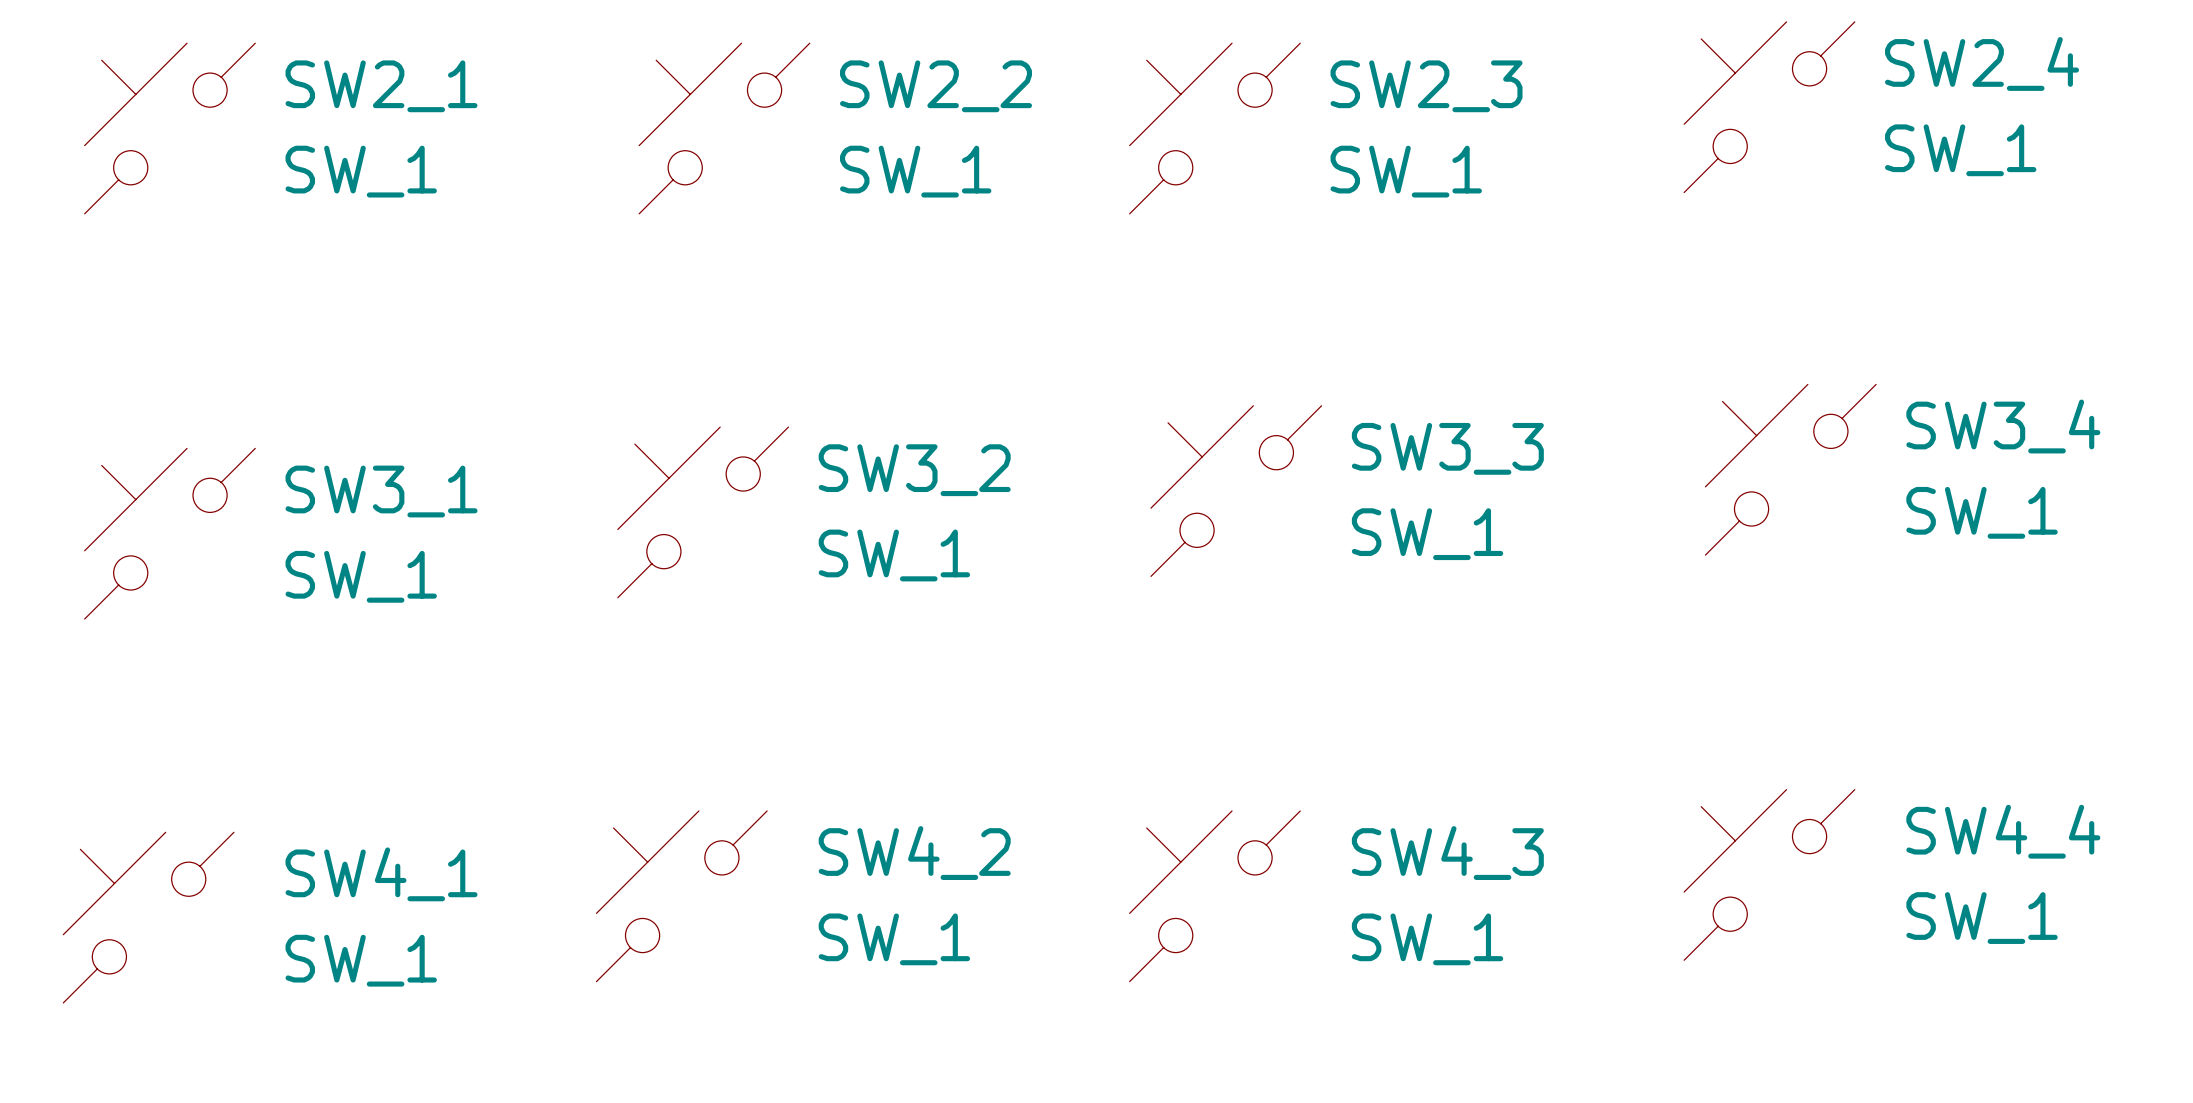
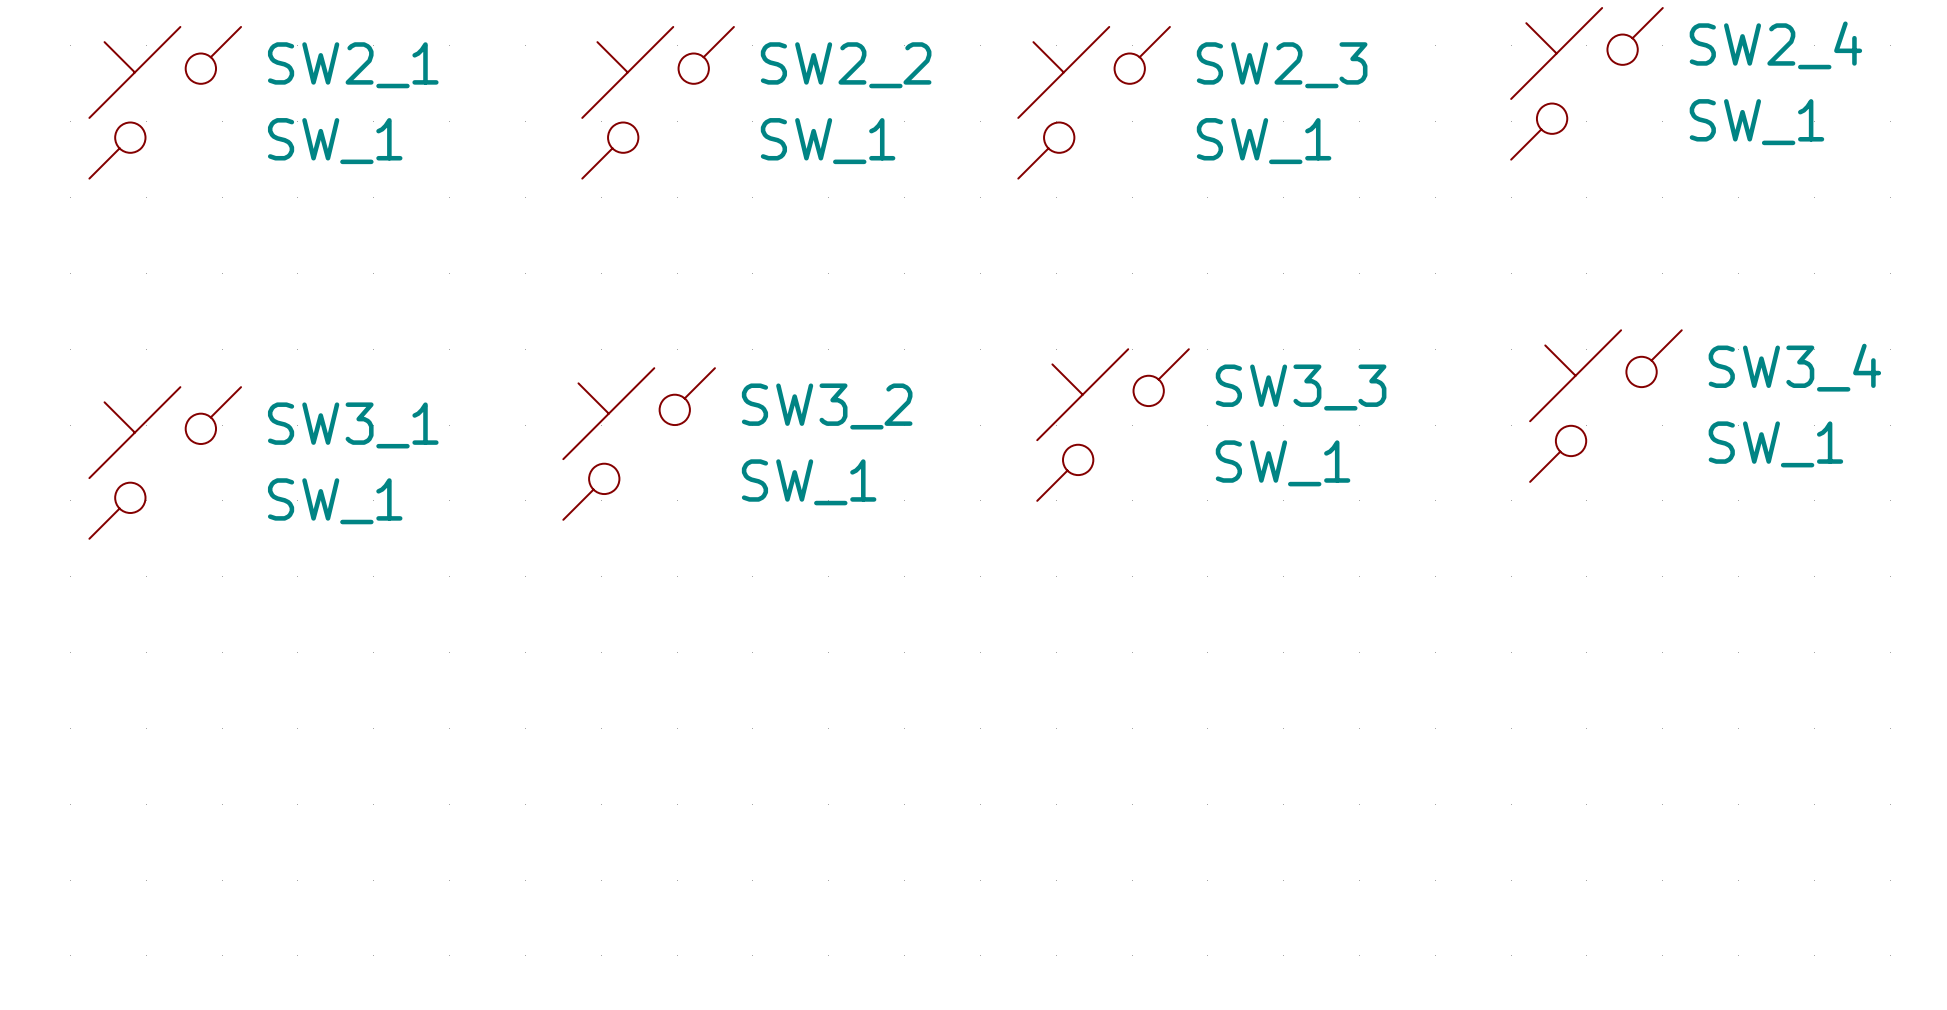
SW4_4: SW_1 (1769, 874) -> none
SW4_2: SW_1 (681, 896) -> none
SW4_3: SW_1 (1214, 896) -> none
SW4_1: SW_1 (148, 917) -> none

